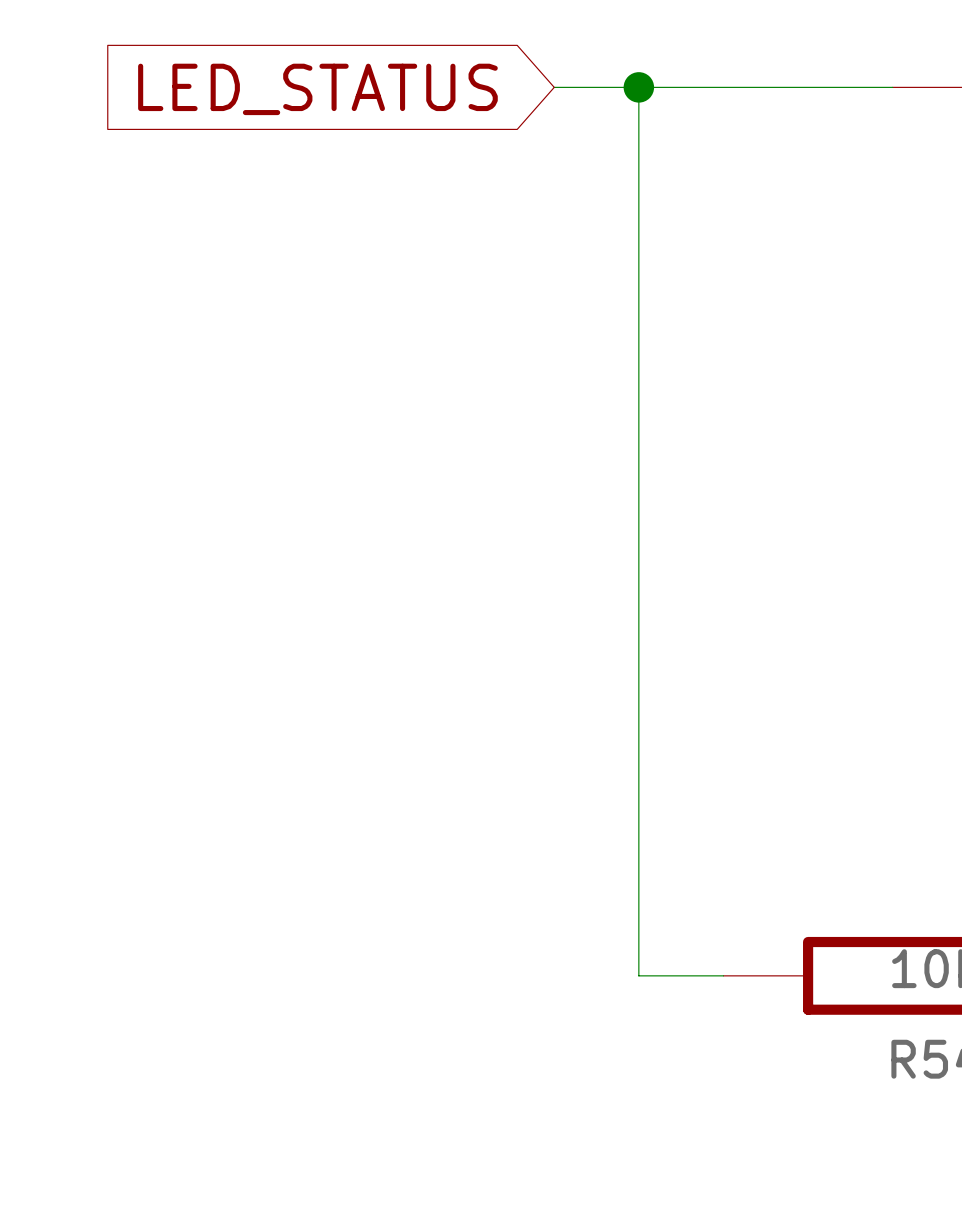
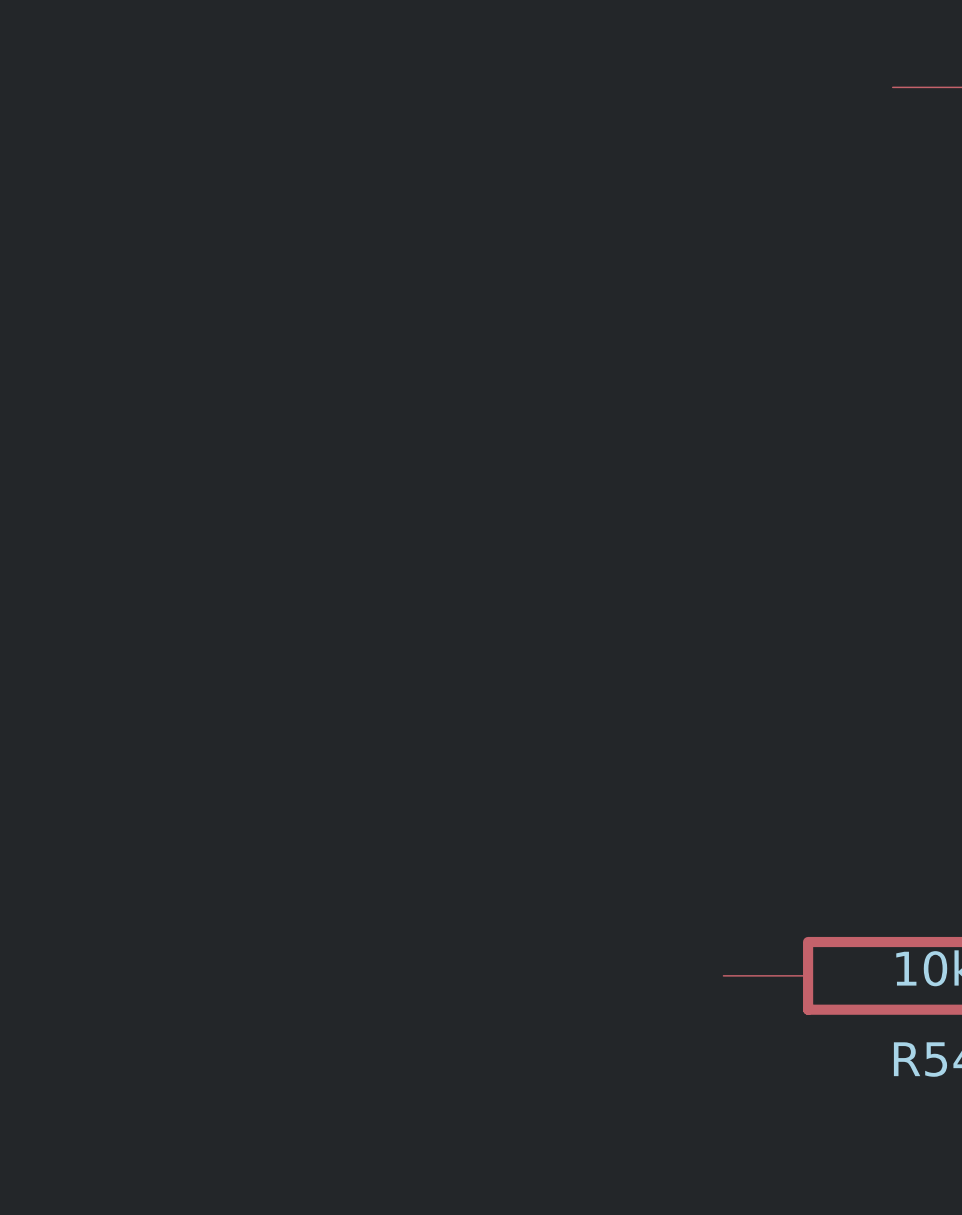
wire: (554, 87) (892, 87) -> none
wire: (638, 87) (638, 975) (723, 975) -> none
junction: (638, 87) -> none
global label: LED_STATUS (317, 89) -> none

